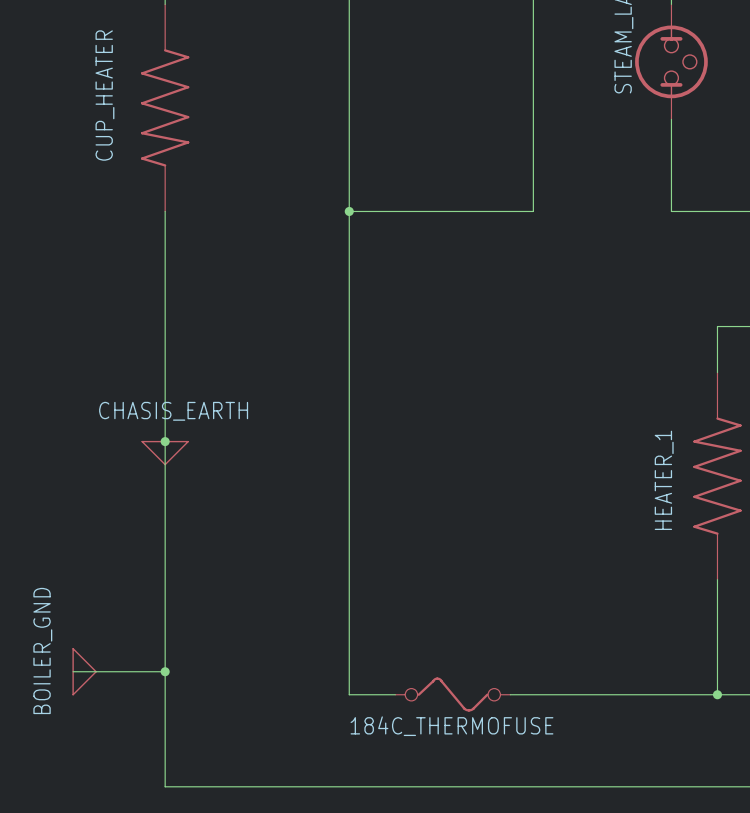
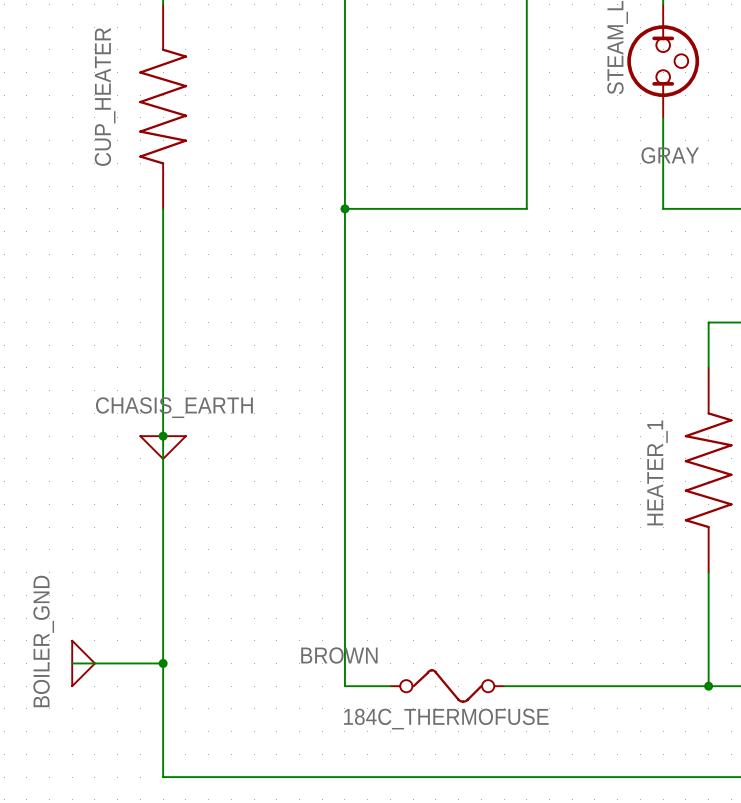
label: none -> GRAY (670, 155)
label: none -> BROWN (339, 655)

